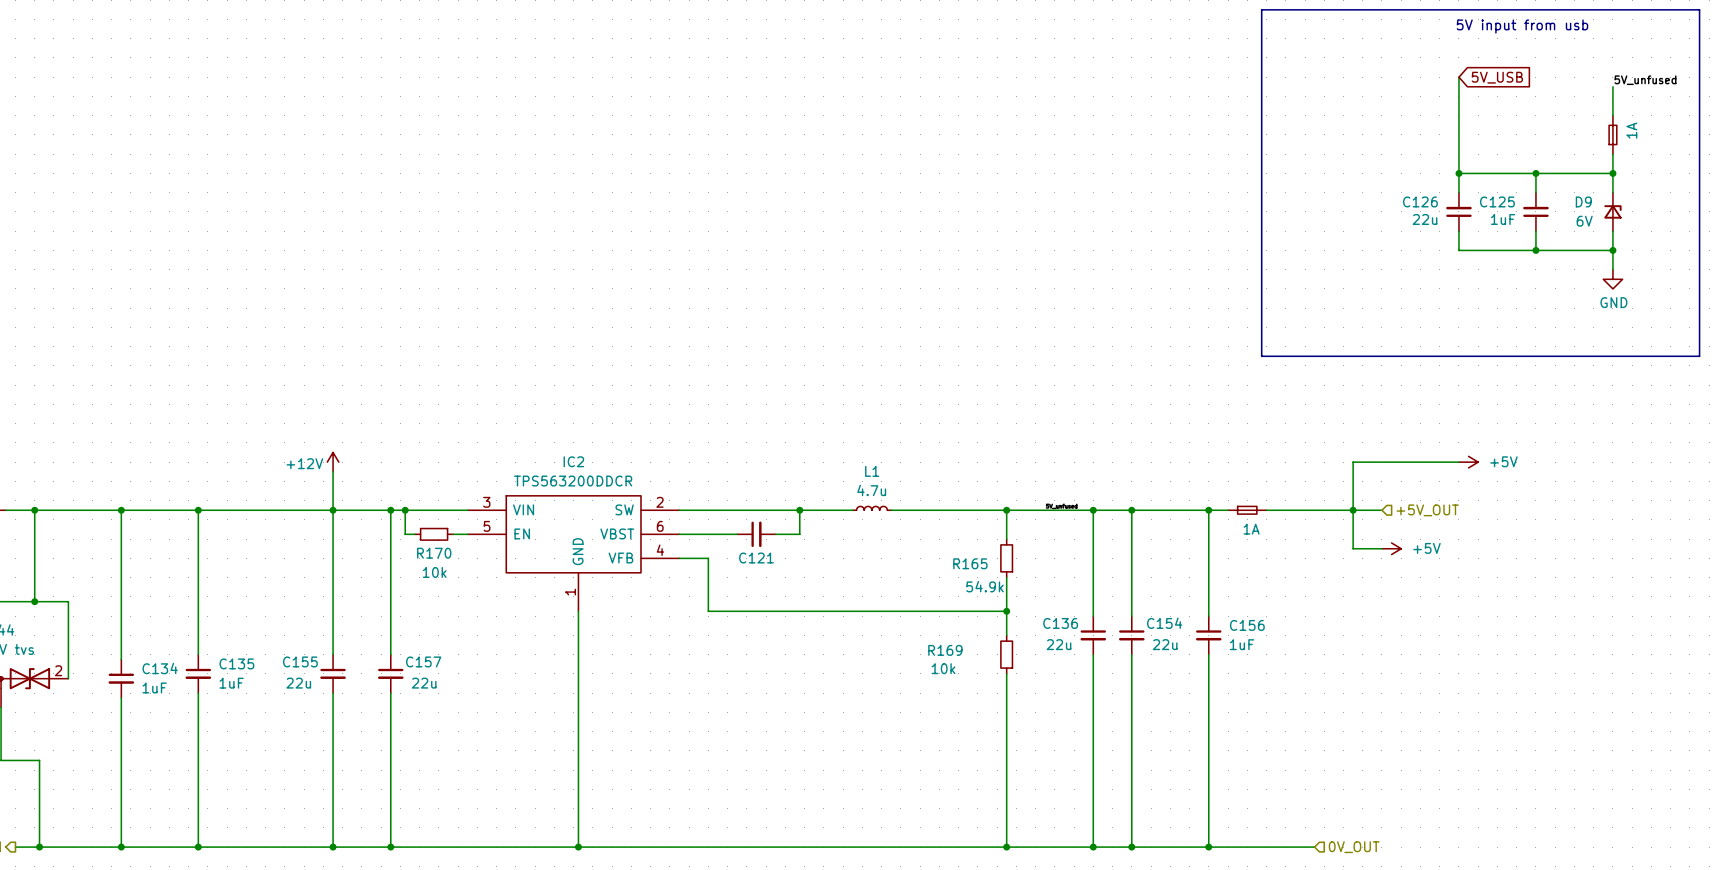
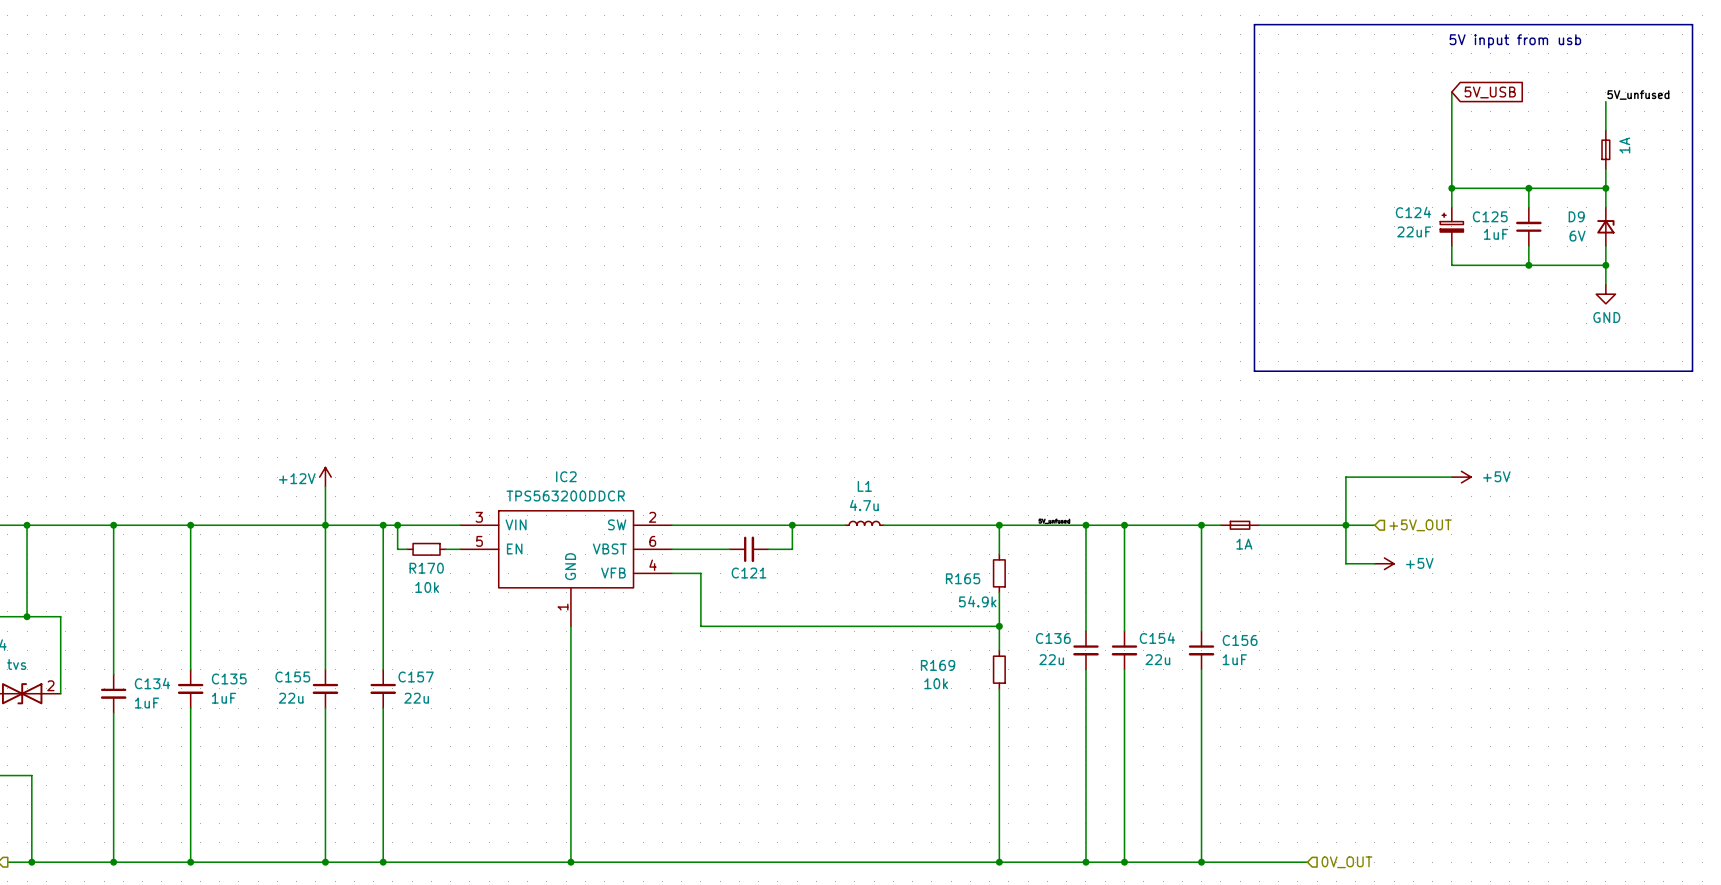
C126: 22u (1458, 211) -> none
C124: none -> 22uF (1451, 226)

